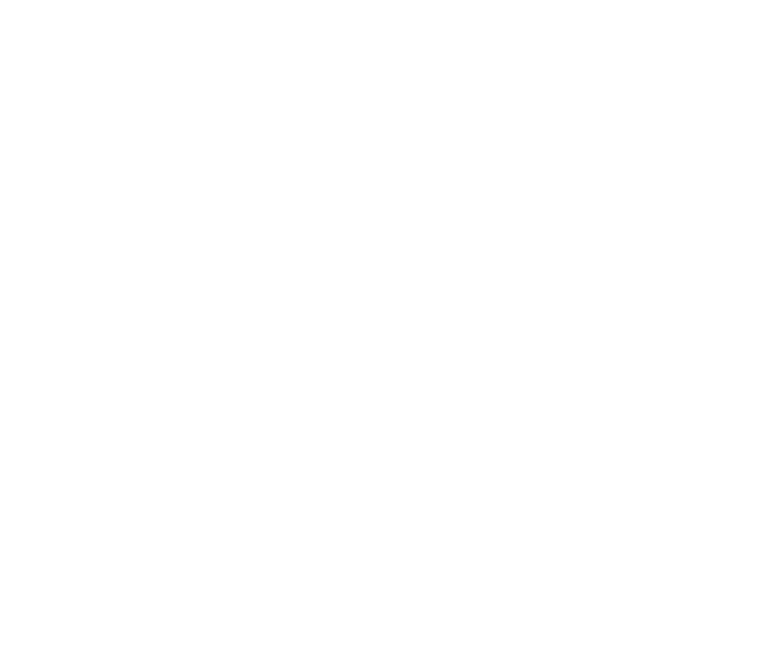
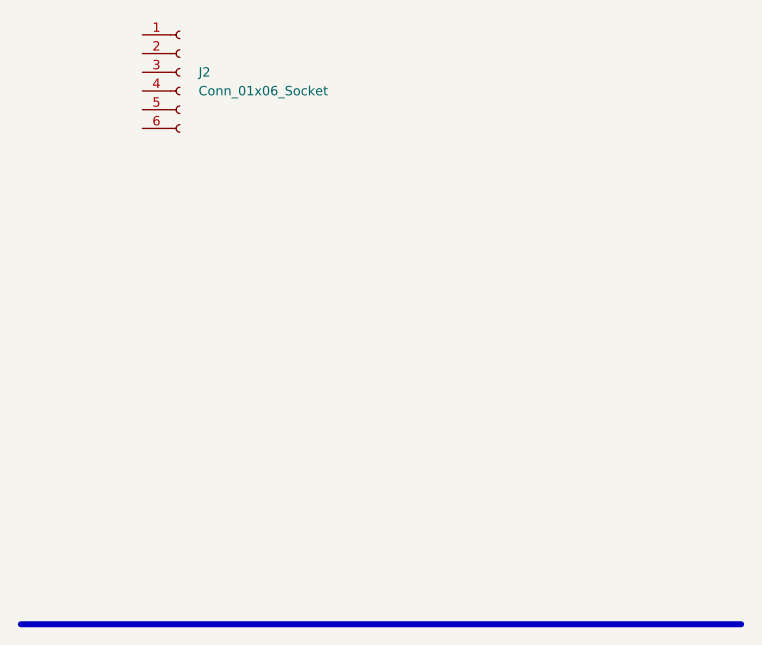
J2: none -> Conn_01x06_Socket (161, 81)
line: none -> (20, 624) (741, 624)

